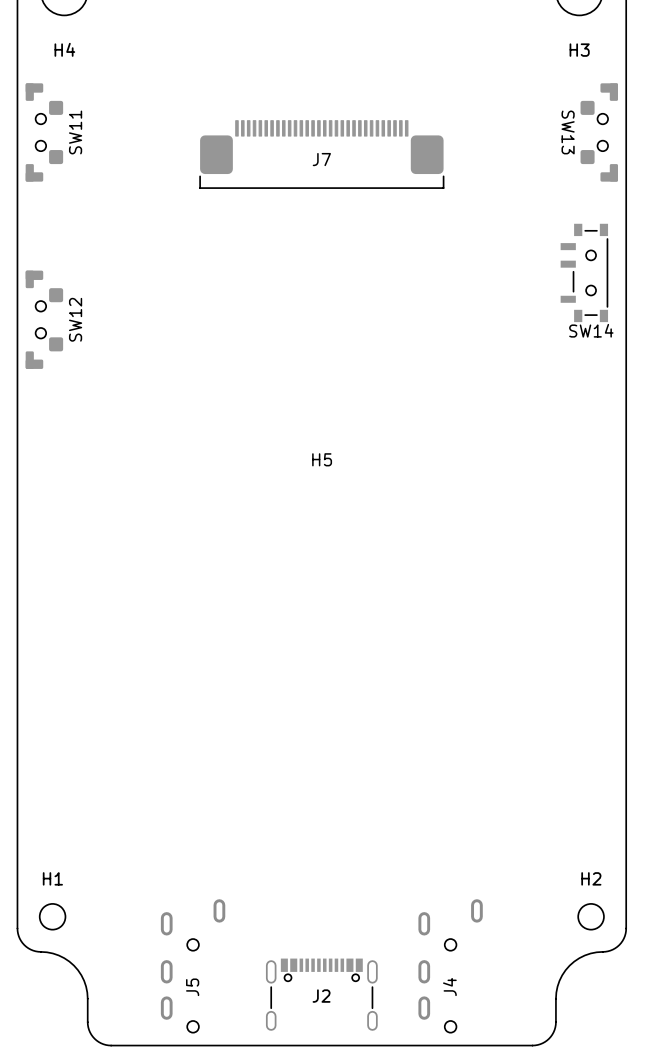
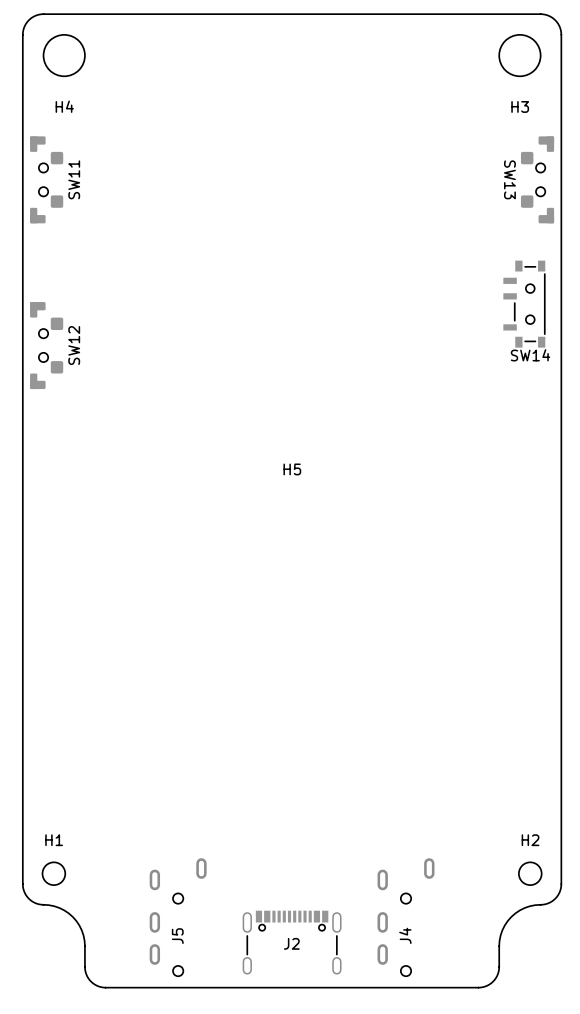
J7: (321, 154) -> none

